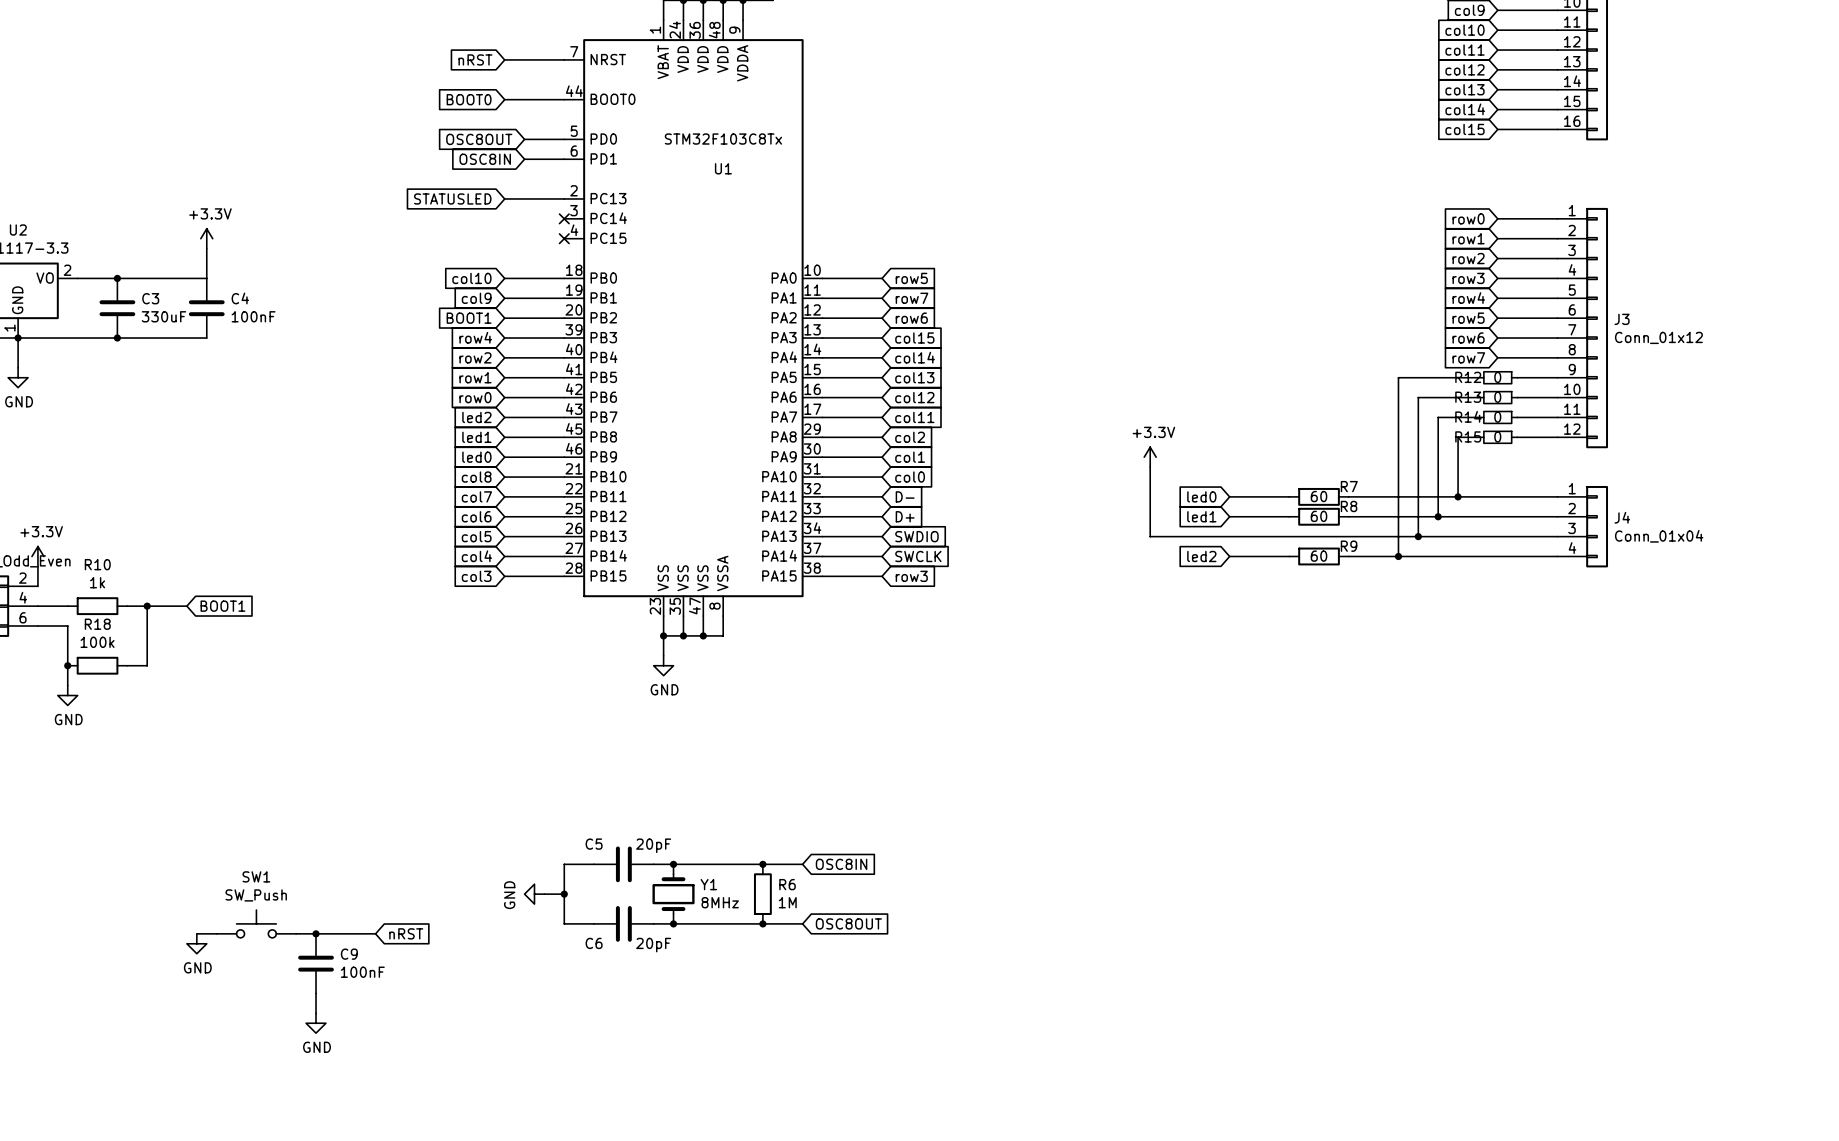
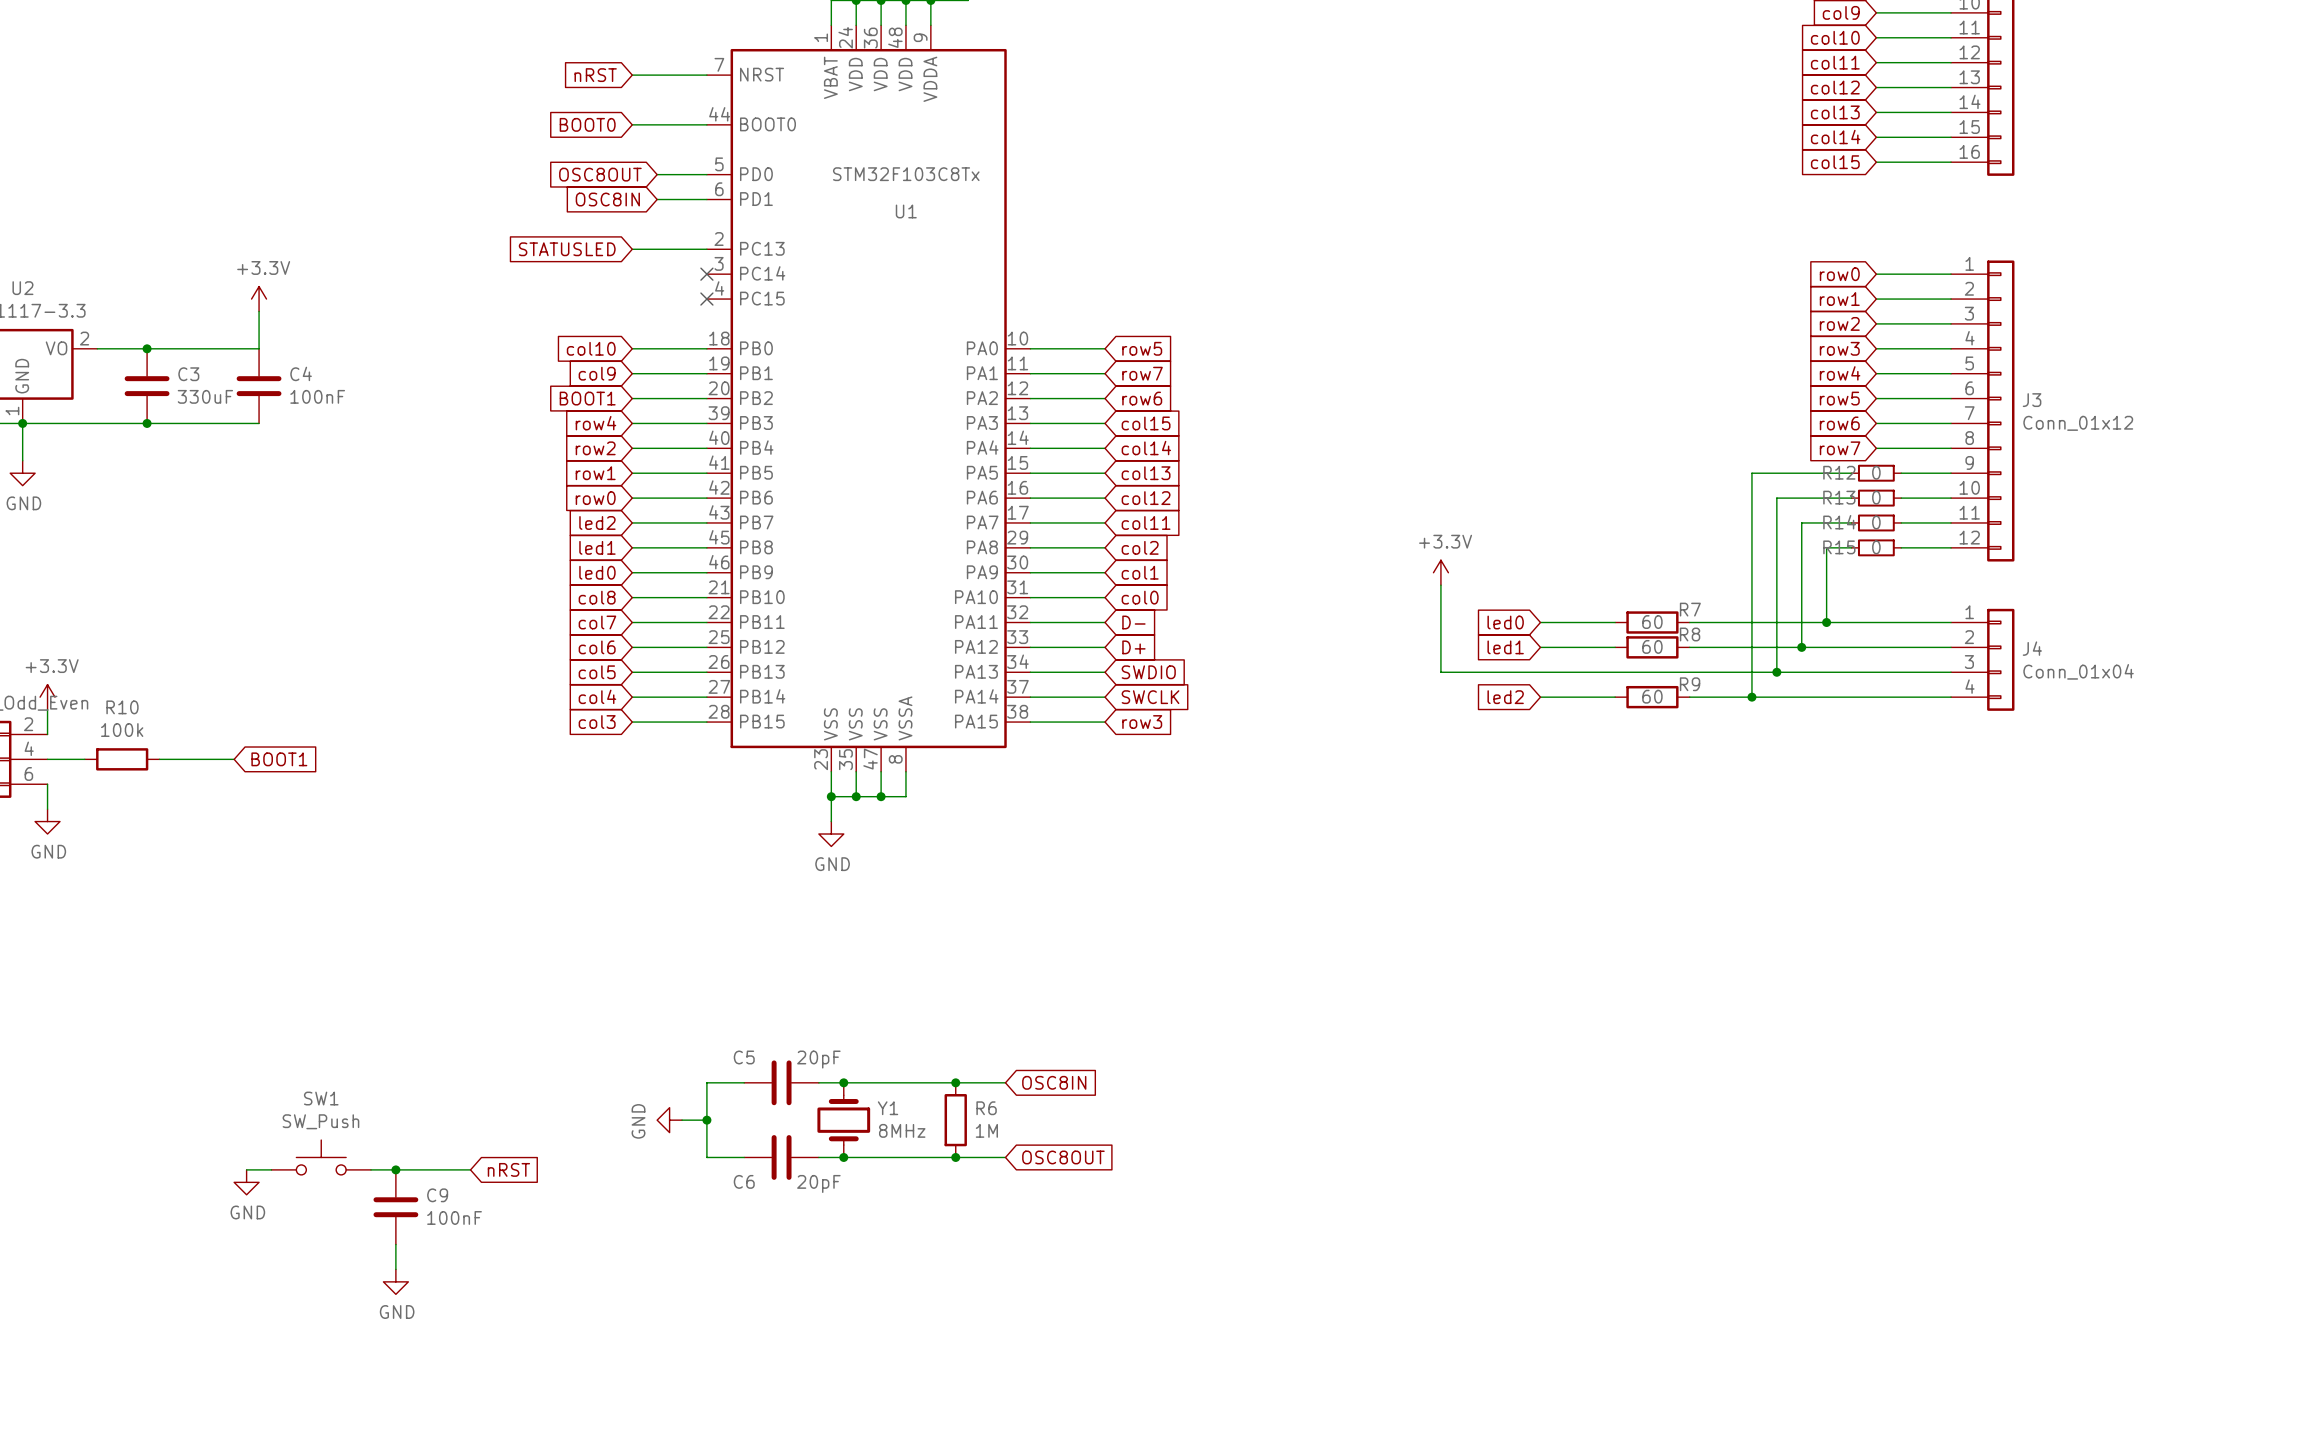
R10 value: 1k (97, 582) -> 100k (122, 730)
wire: (147, 606) (147, 665) (127, 665) -> none
junction: (147, 606) -> none
wire: (37, 626) (67, 626) (67, 685) -> (47, 784) (47, 809)
junction: (67, 665) -> none
R18: 100k (97, 665) -> none
power symbol position: GND (67, 695) -> GND (47, 821)

